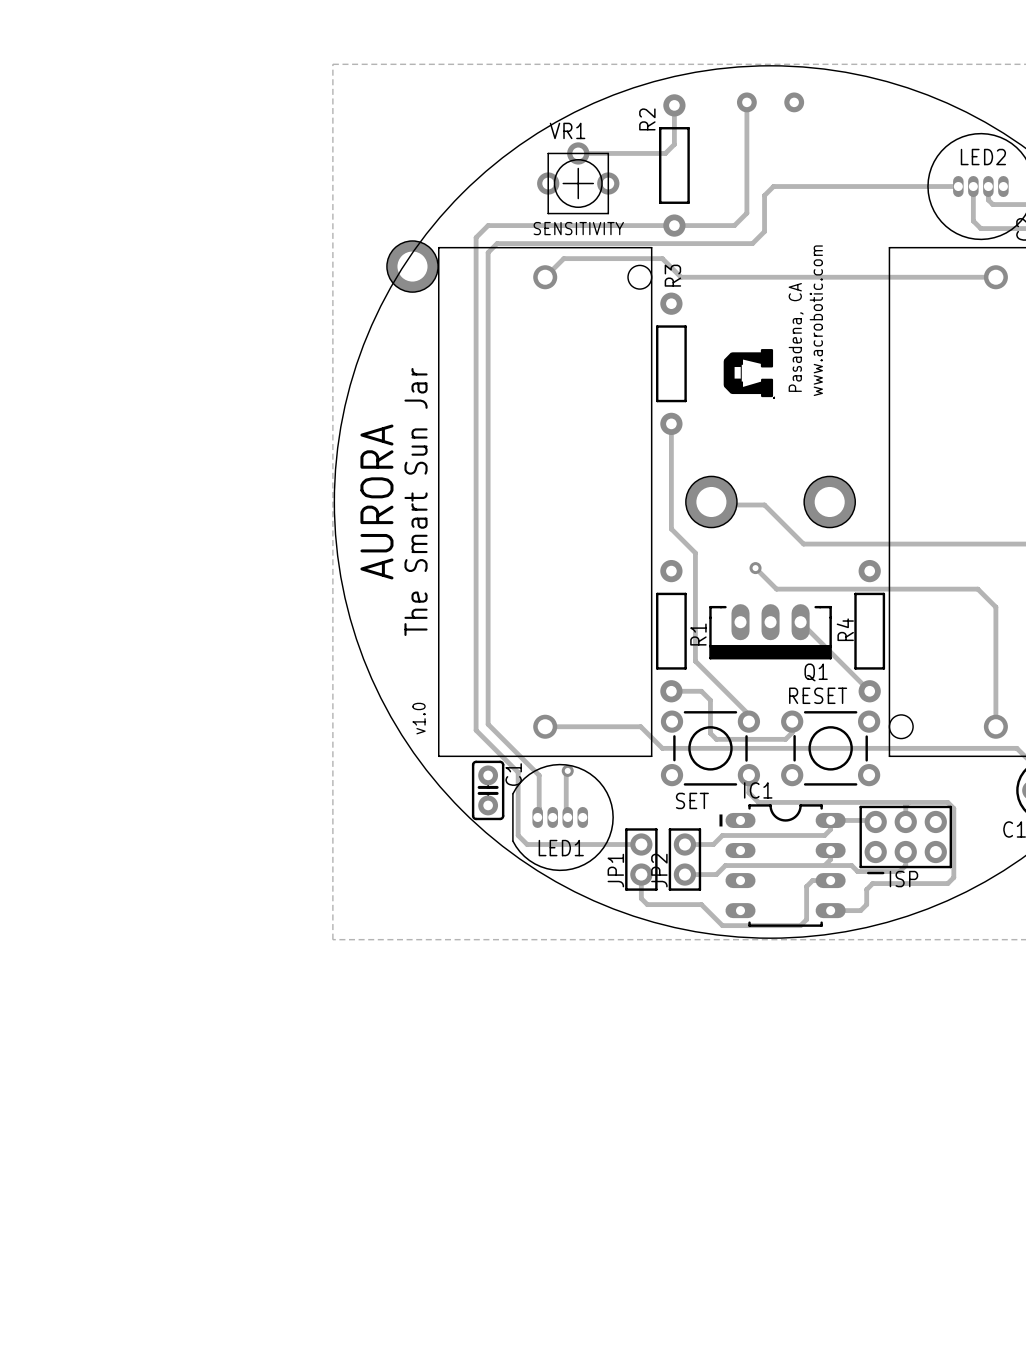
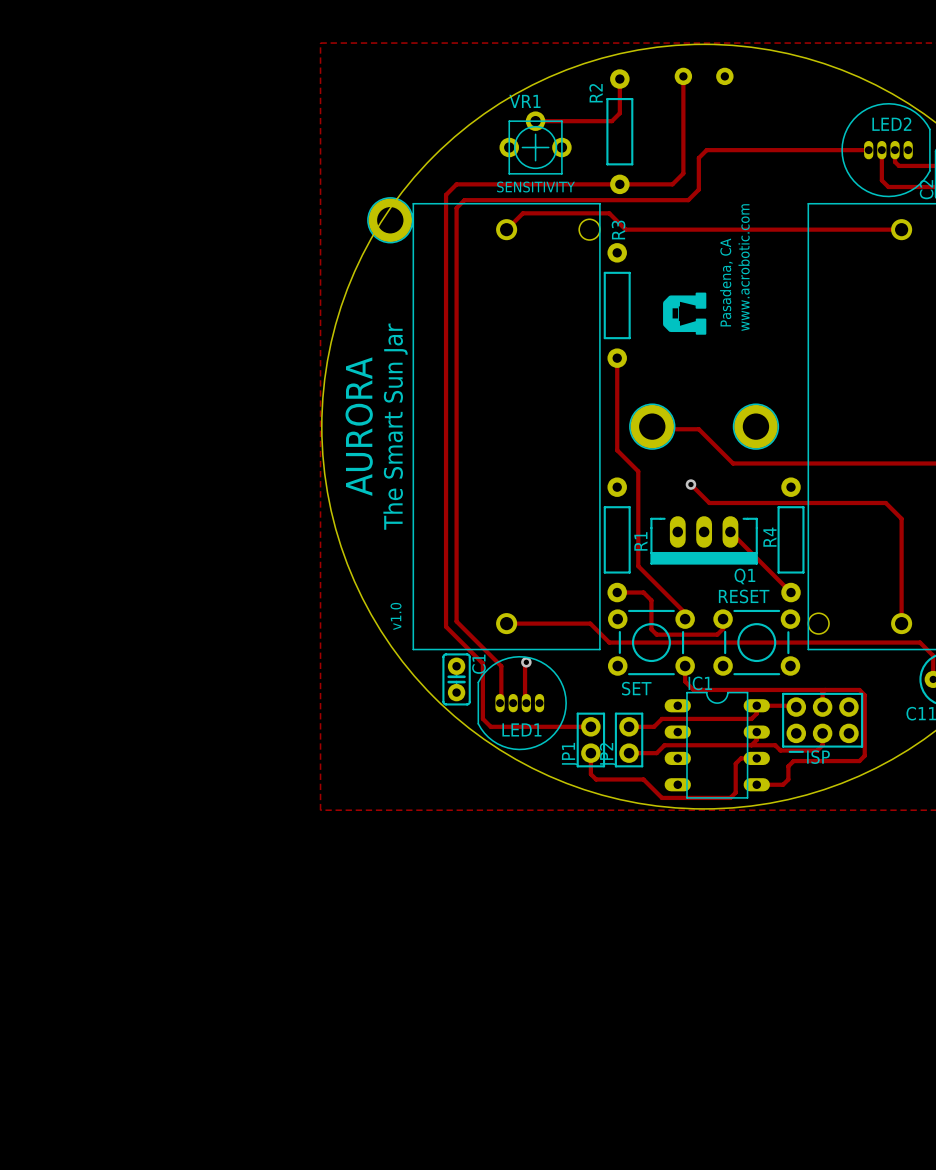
IC1 footprint: [719, 804, 846, 927] -> [664, 691, 770, 799]

